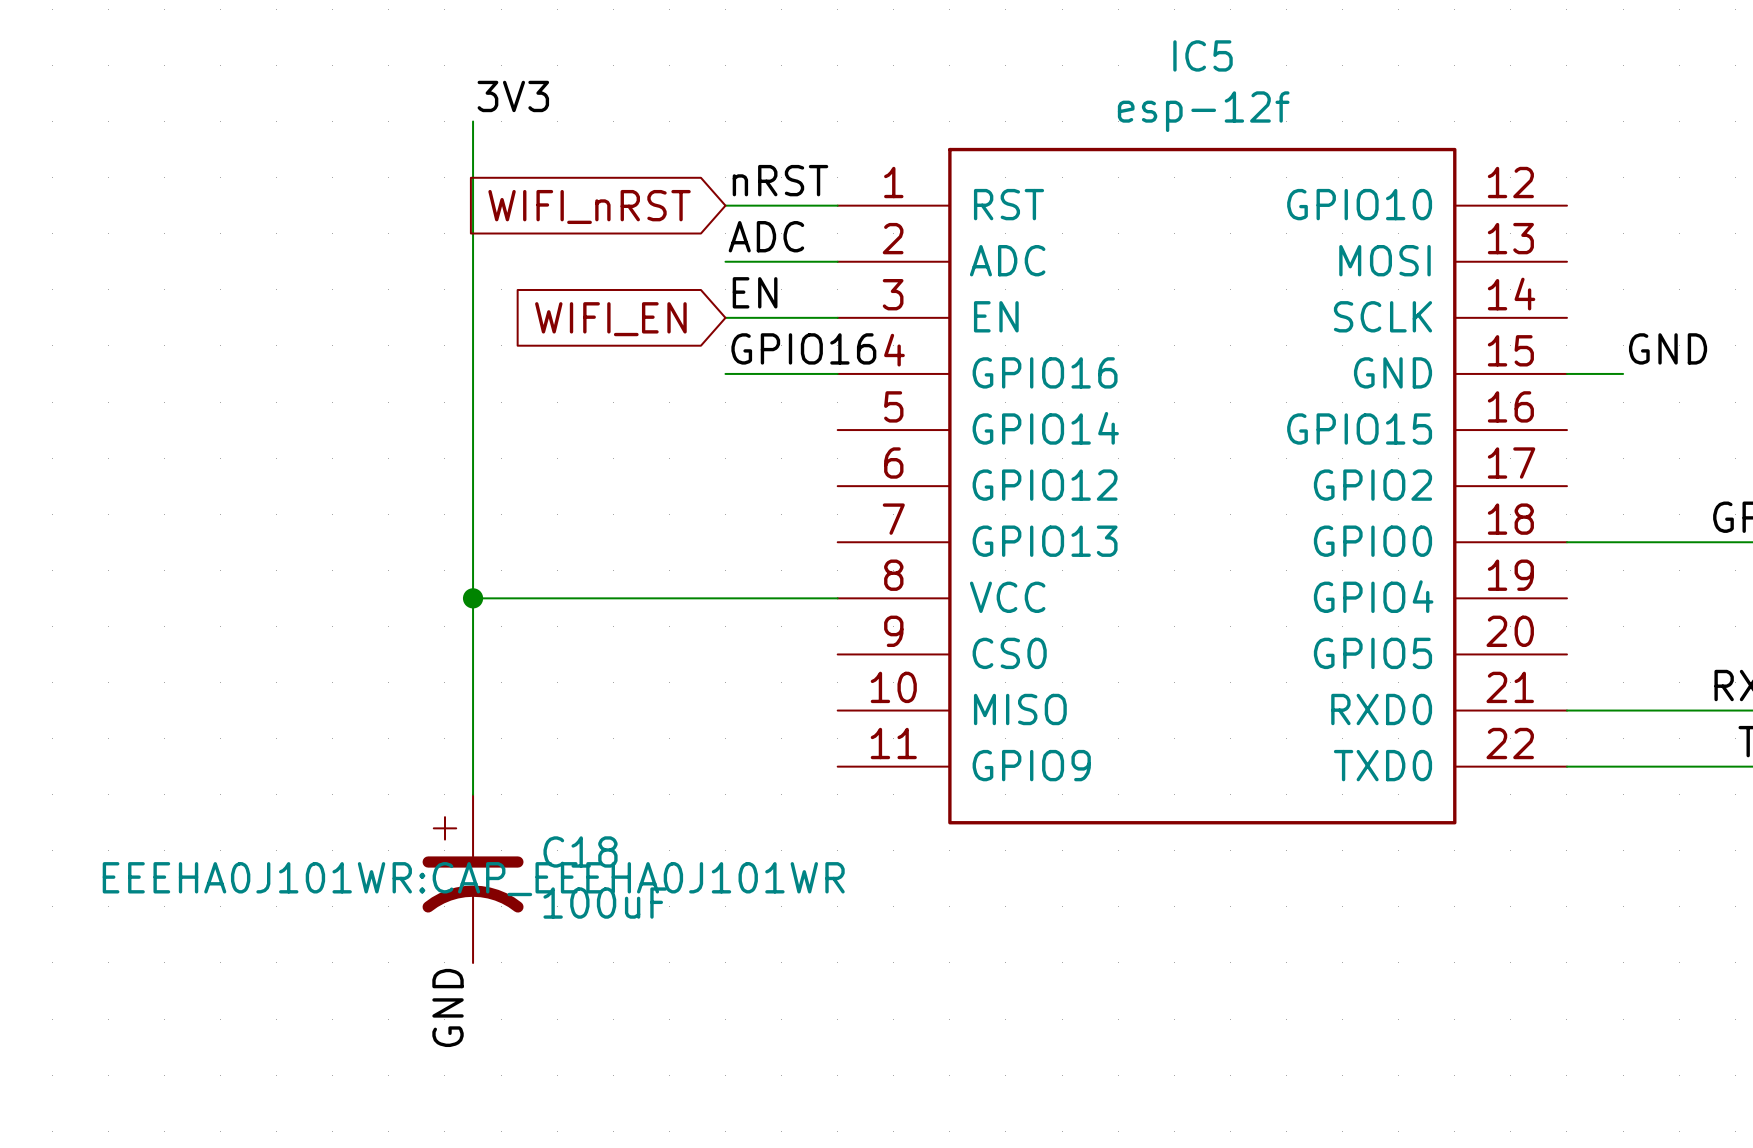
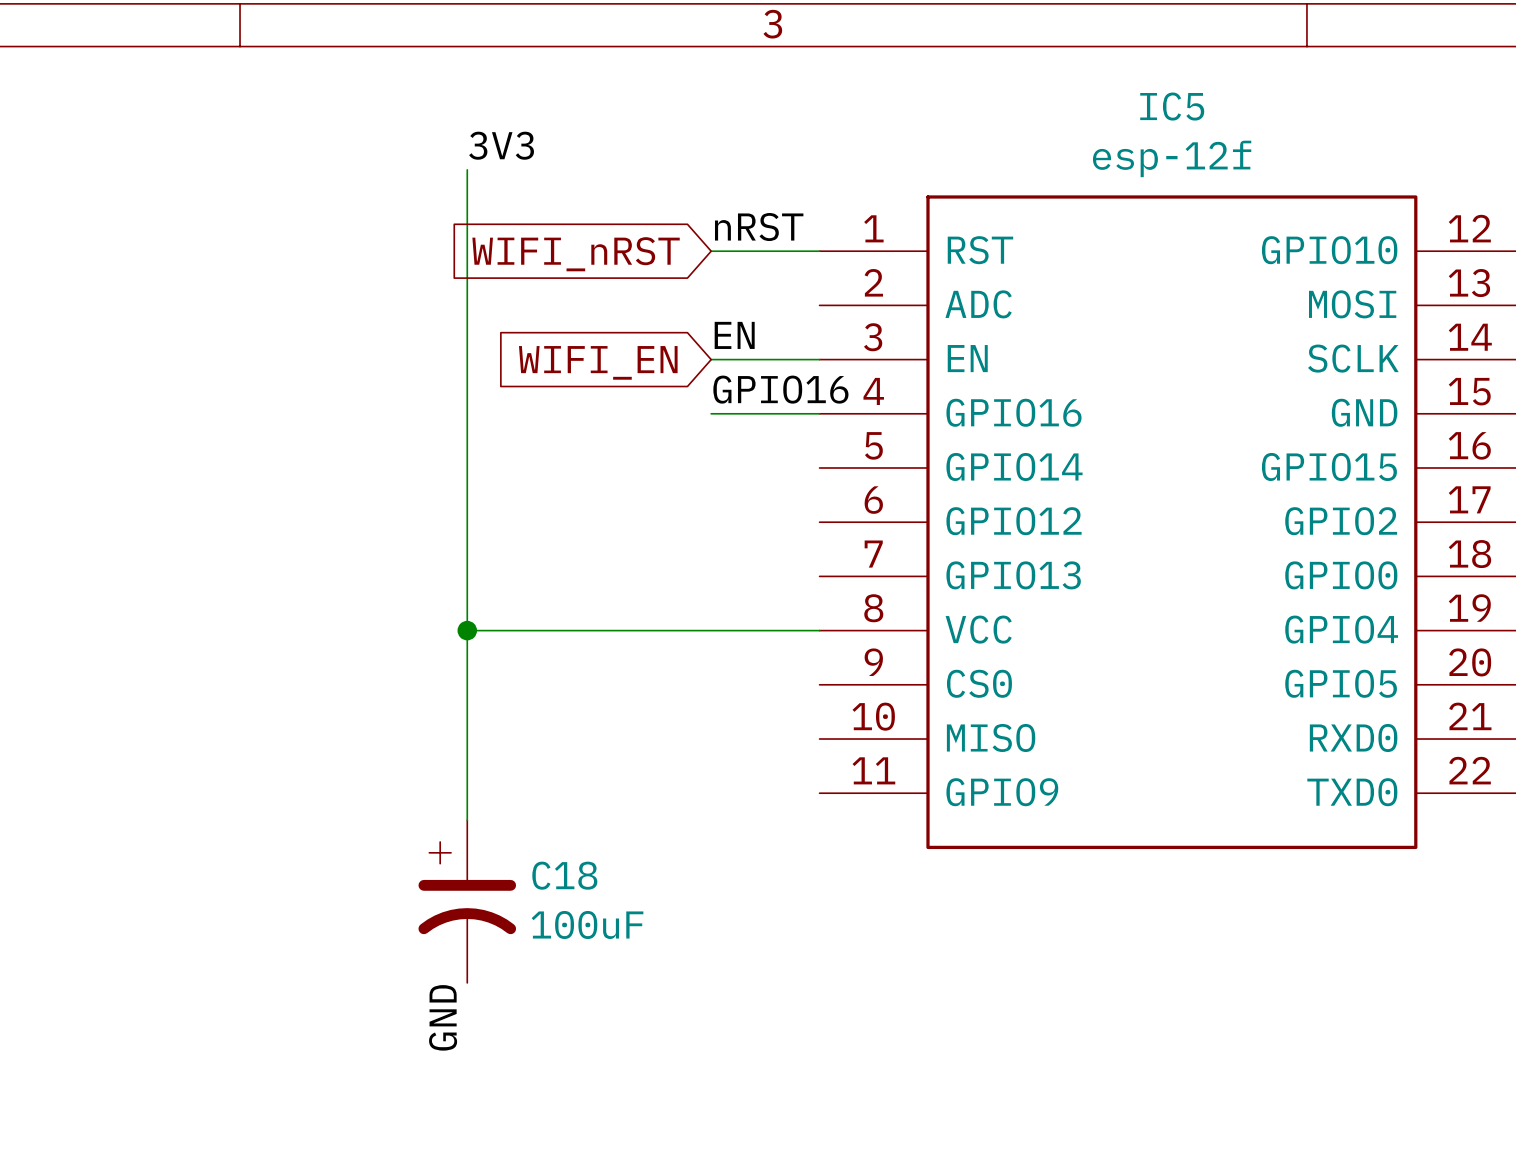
label: ADC (766, 236) -> none
wire: (725, 261) (837, 261) -> none
C18 text: EEEHA0J101WR:CAP_EEEHA0J101WR (473, 879) -> none

